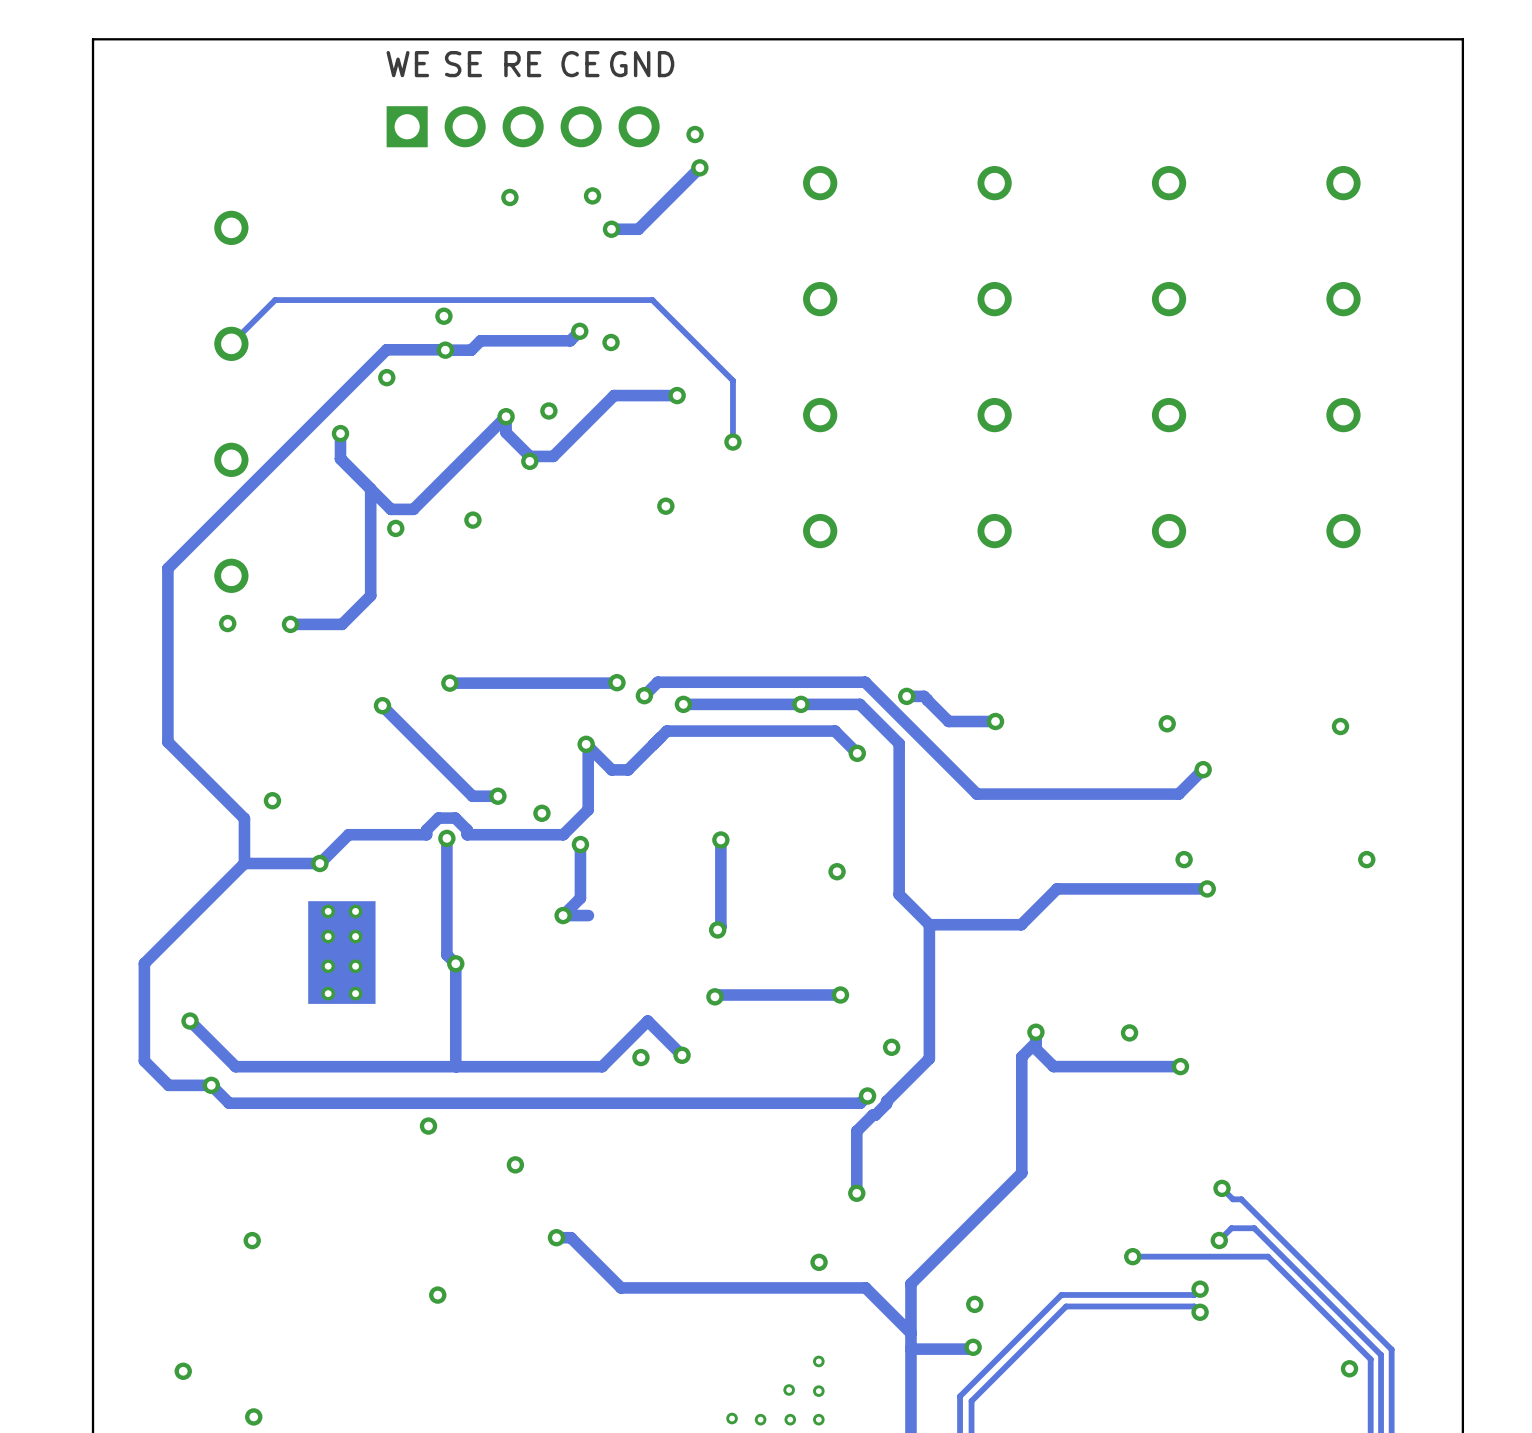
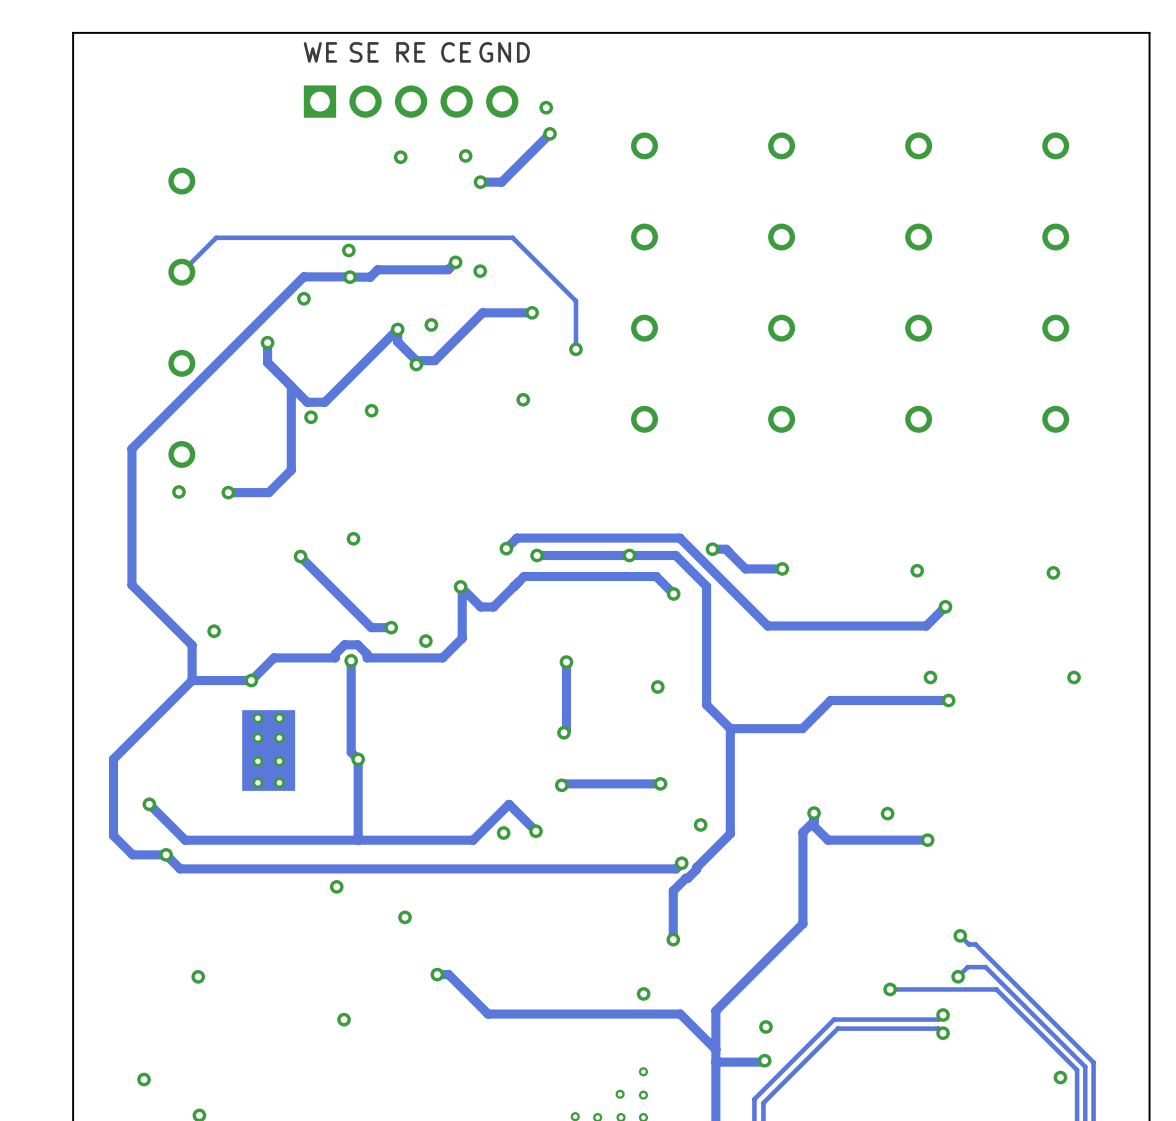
track: (616, 682) (449, 683) -> none
via: (616, 682) -> none
track: (580, 844) (580, 898) (563, 915) (588, 915) -> none
via: (580, 844) -> none
via: (563, 915) -> none

